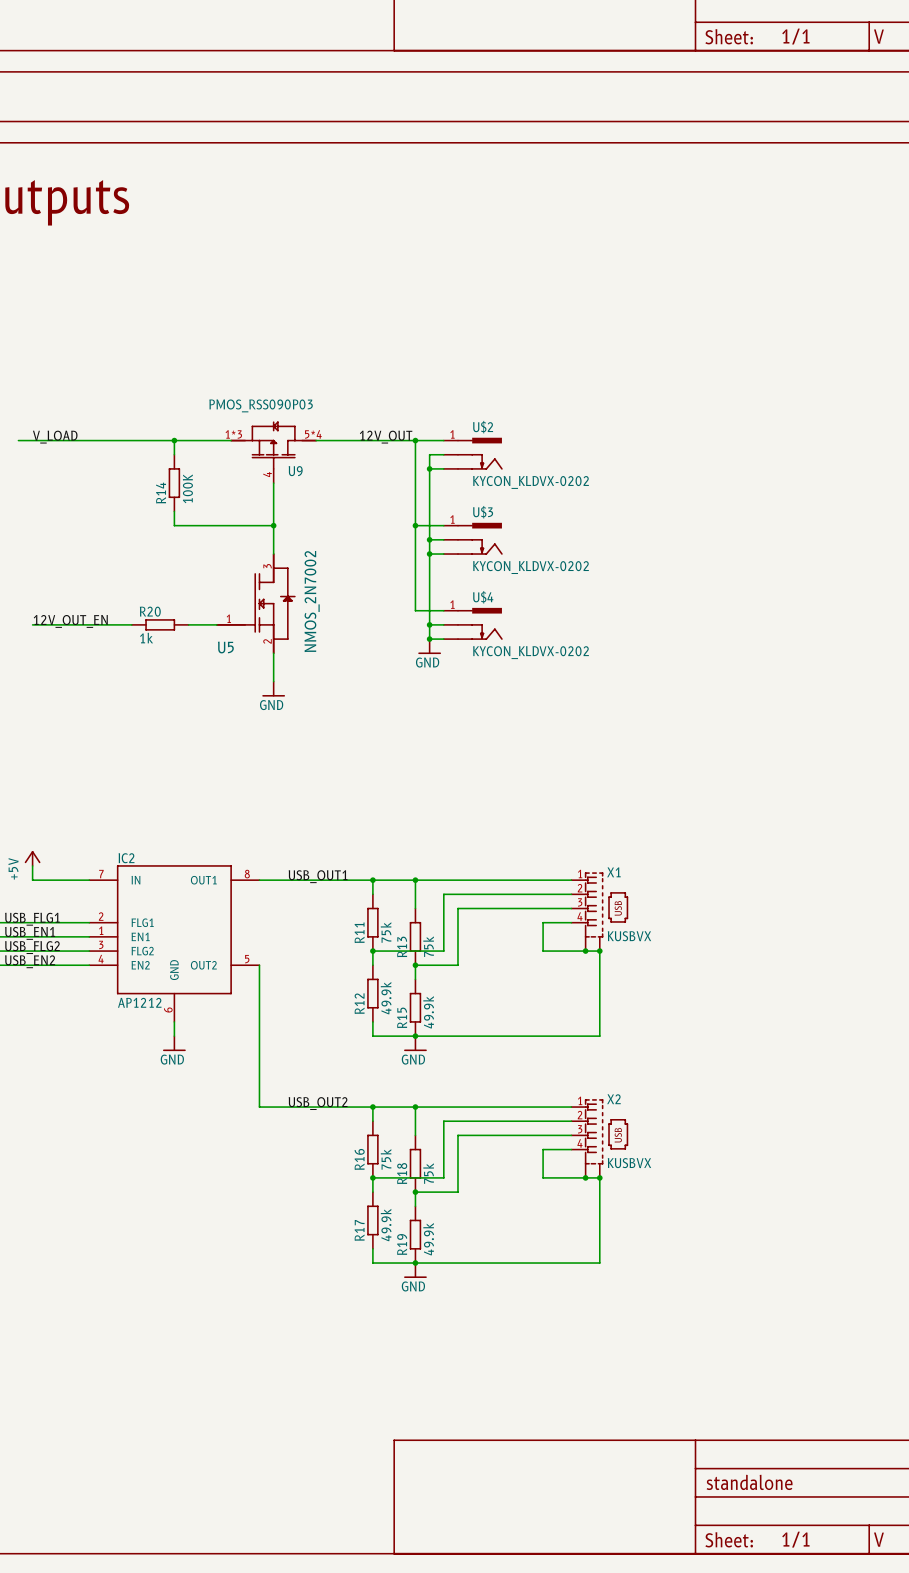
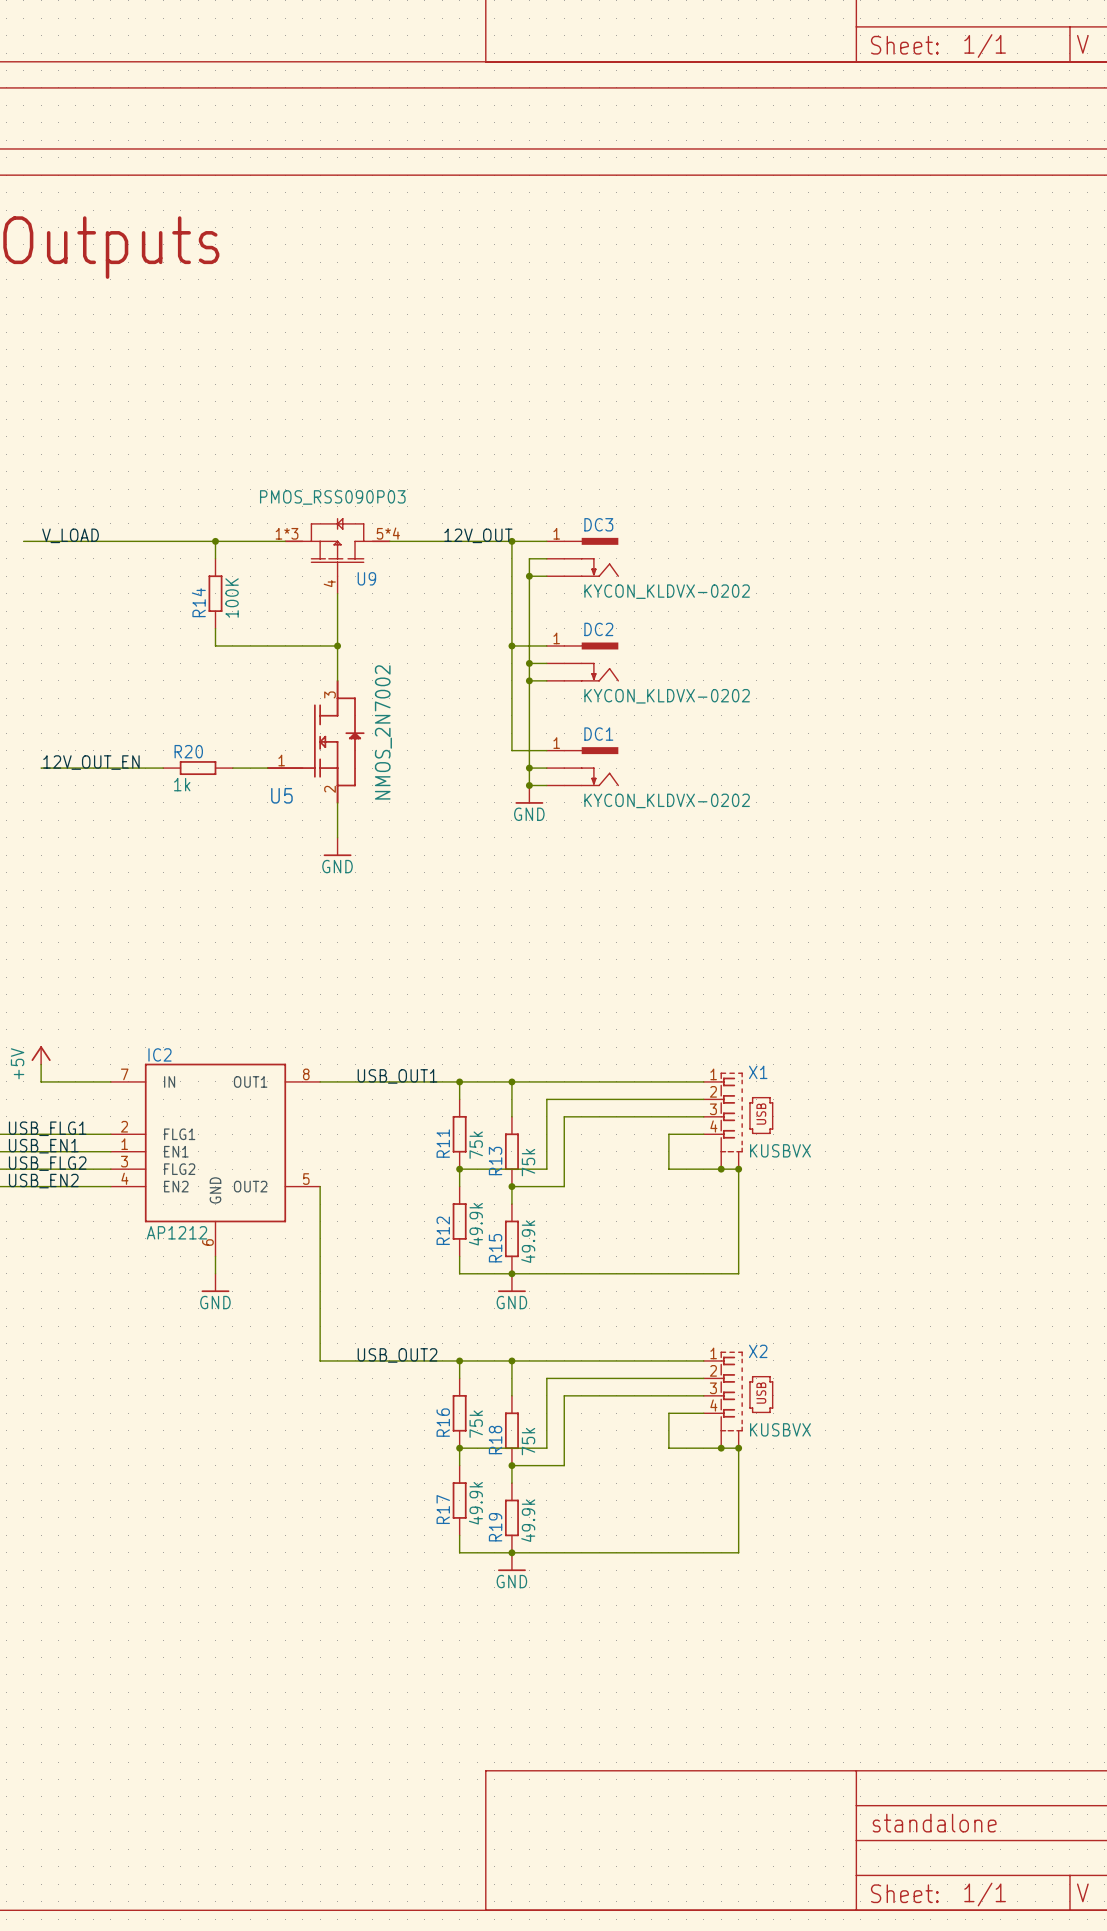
U$2 name: U$2 (483, 427) -> DC3 (598, 524)
U$3 name: U$3 (483, 512) -> DC2 (598, 629)
U$4 name: U$4 (483, 597) -> DC1 (598, 734)

